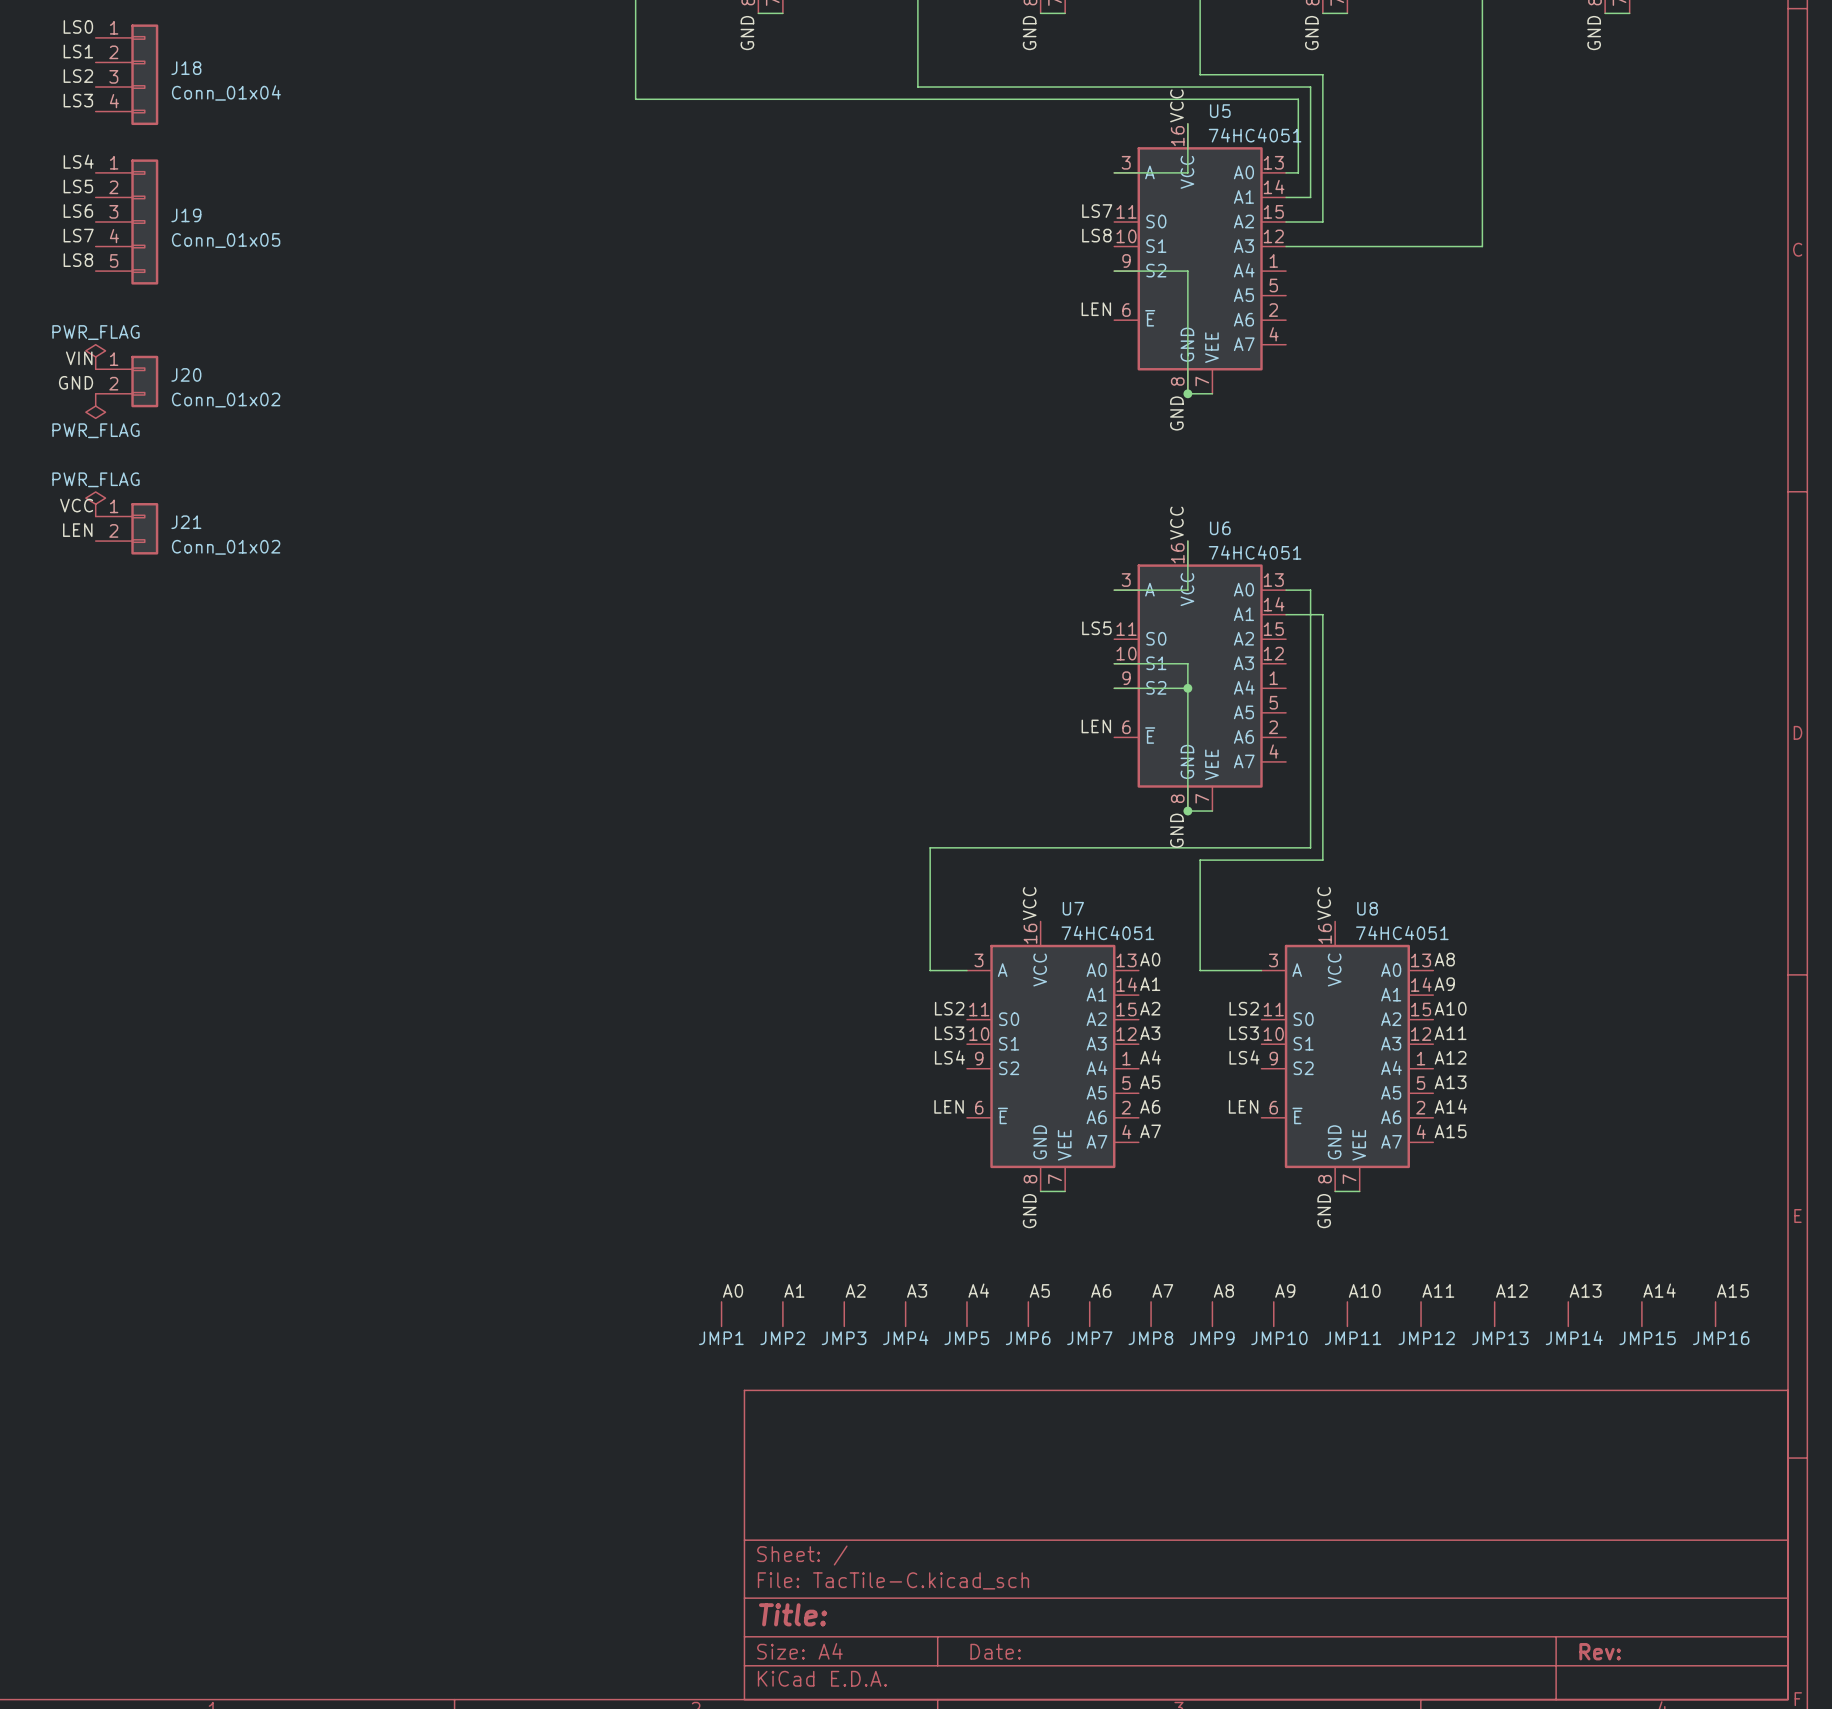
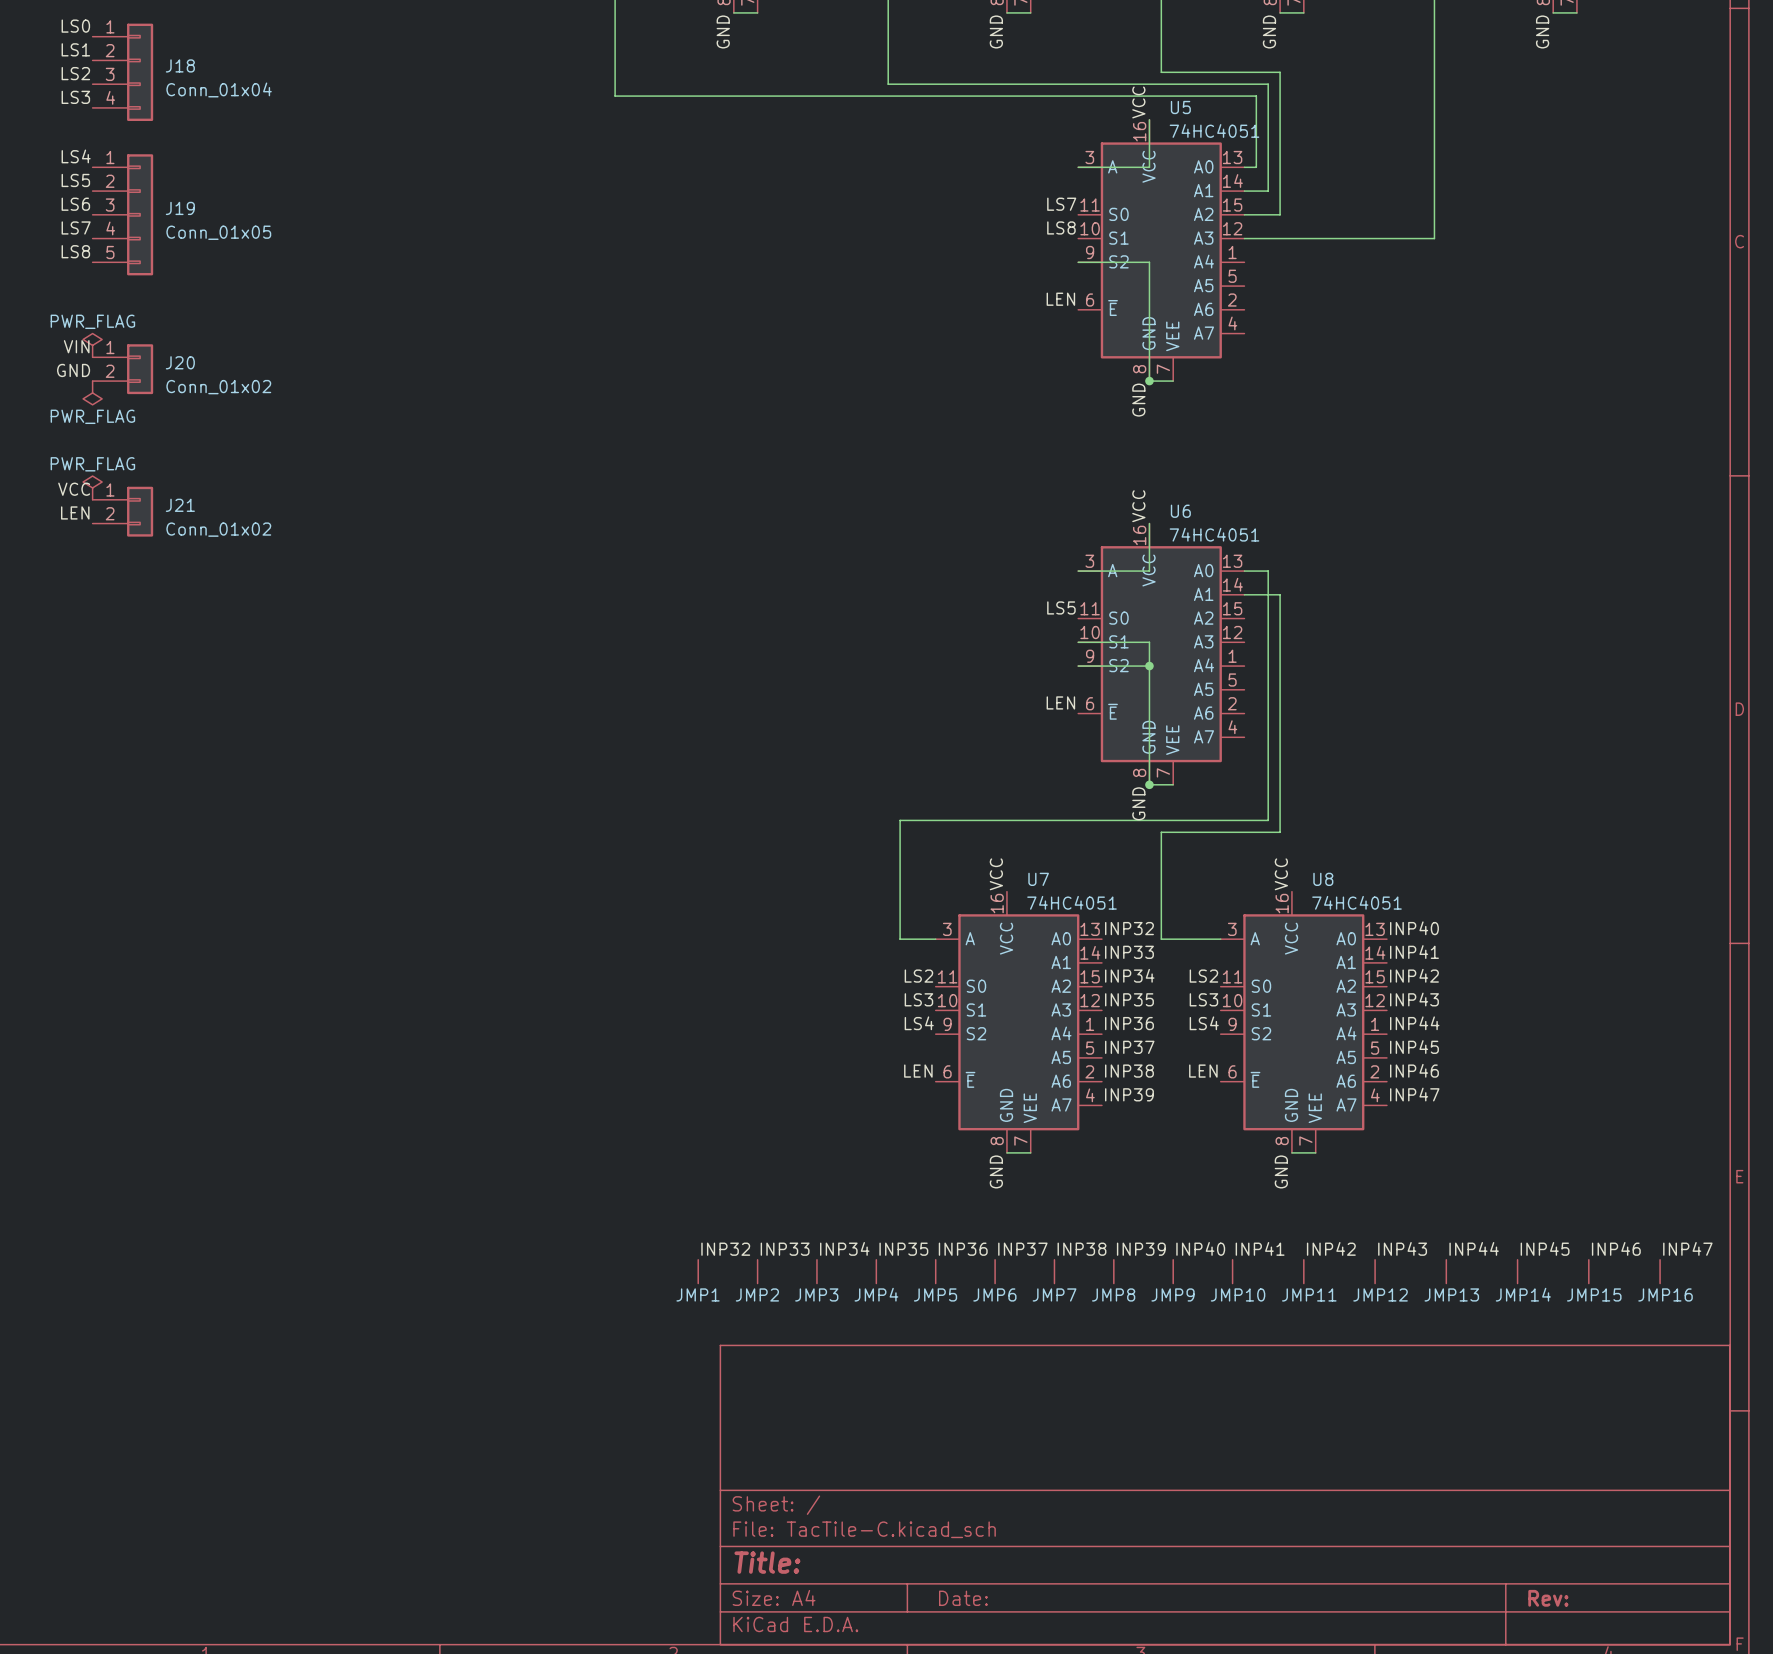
label: A0 (1150, 959) -> INP32 (1129, 928)
label: A8 (1444, 959) -> INP40 (1414, 928)
label: A1 (1150, 984) -> INP33 (1129, 952)
label: A9 (1444, 984) -> INP41 (1414, 952)
label: A2 (1150, 1008) -> INP34 (1129, 975)
label: A10 (1450, 1008) -> INP42 (1414, 975)
label: A3 (1150, 1033) -> INP35 (1129, 999)
label: A11 (1450, 1033) -> INP43 (1414, 999)
label: A4 (1150, 1057) -> INP36 (1129, 1023)
label: A12 (1450, 1057) -> INP44 (1414, 1023)
label: A5 (1150, 1082) -> INP37 (1129, 1047)
label: A13 (1450, 1082) -> INP45 (1414, 1047)
label: A6 (1150, 1106) -> INP38 (1129, 1071)
label: A14 (1450, 1106) -> INP46 (1414, 1070)
label: A7 (1150, 1131) -> INP39 (1129, 1094)
label: A15 (1450, 1131) -> INP47 (1414, 1094)
label: A0 (733, 1290) -> INP32 (725, 1249)
label: A1 (794, 1290) -> INP33 (785, 1249)
label: A2 (855, 1290) -> INP34 (844, 1248)
label: A3 (917, 1290) -> INP35 (903, 1249)
label: A4 (978, 1290) -> INP36 (963, 1249)
label: A5 (1039, 1290) -> INP37 (1022, 1249)
label: A6 (1101, 1290) -> INP38 (1081, 1249)
label: A7 (1162, 1290) -> INP39 (1141, 1249)
label: A8 (1223, 1290) -> INP40 (1200, 1248)
label: A9 (1285, 1290) -> INP41 (1260, 1248)
label: A10 (1364, 1290) -> INP42 (1331, 1248)
label: A11 (1438, 1290) -> INP43 (1402, 1248)
label: A12 (1511, 1290) -> INP44 (1474, 1248)
label: A13 (1585, 1290) -> INP45 (1545, 1248)
label: A14 (1659, 1290) -> INP46 (1616, 1248)
label: A15 (1732, 1290) -> INP47 (1687, 1248)

